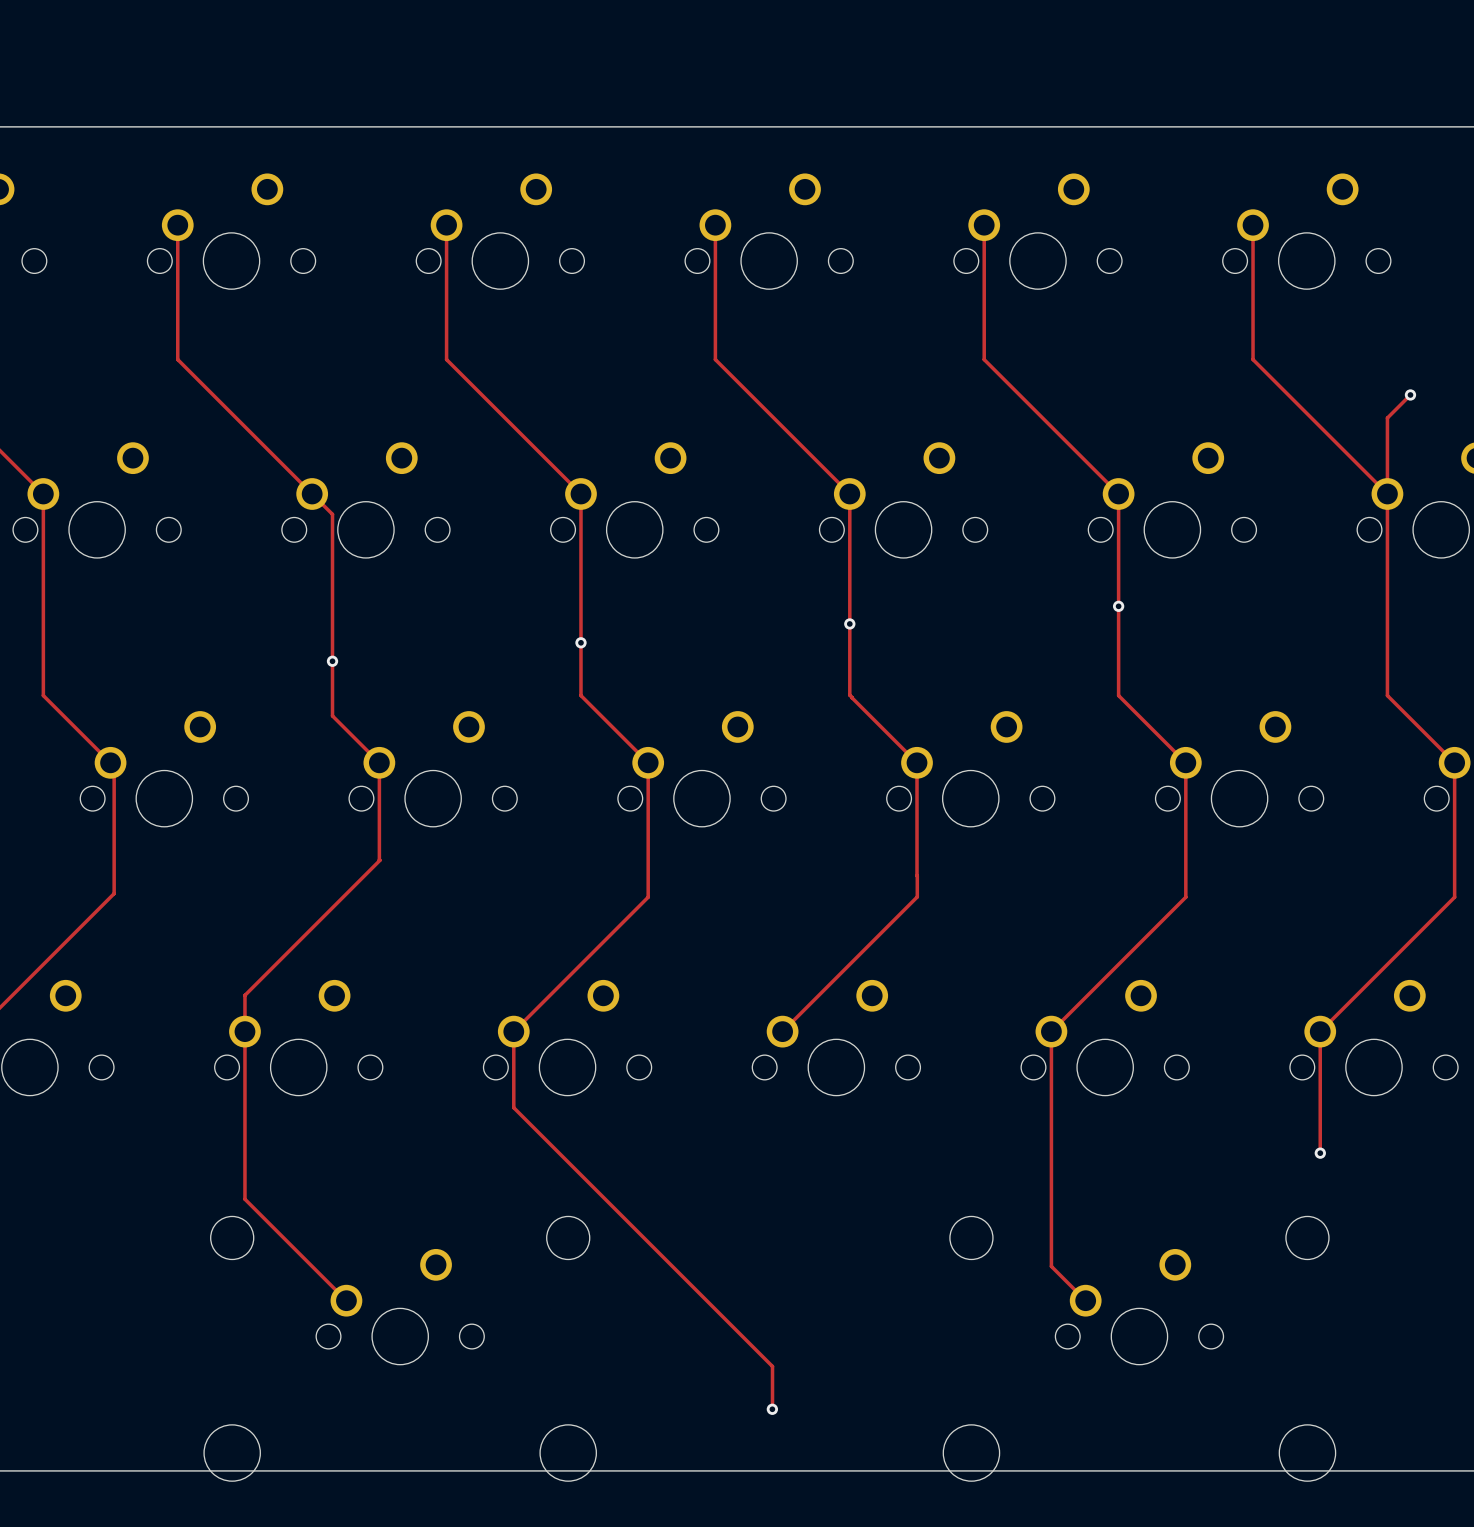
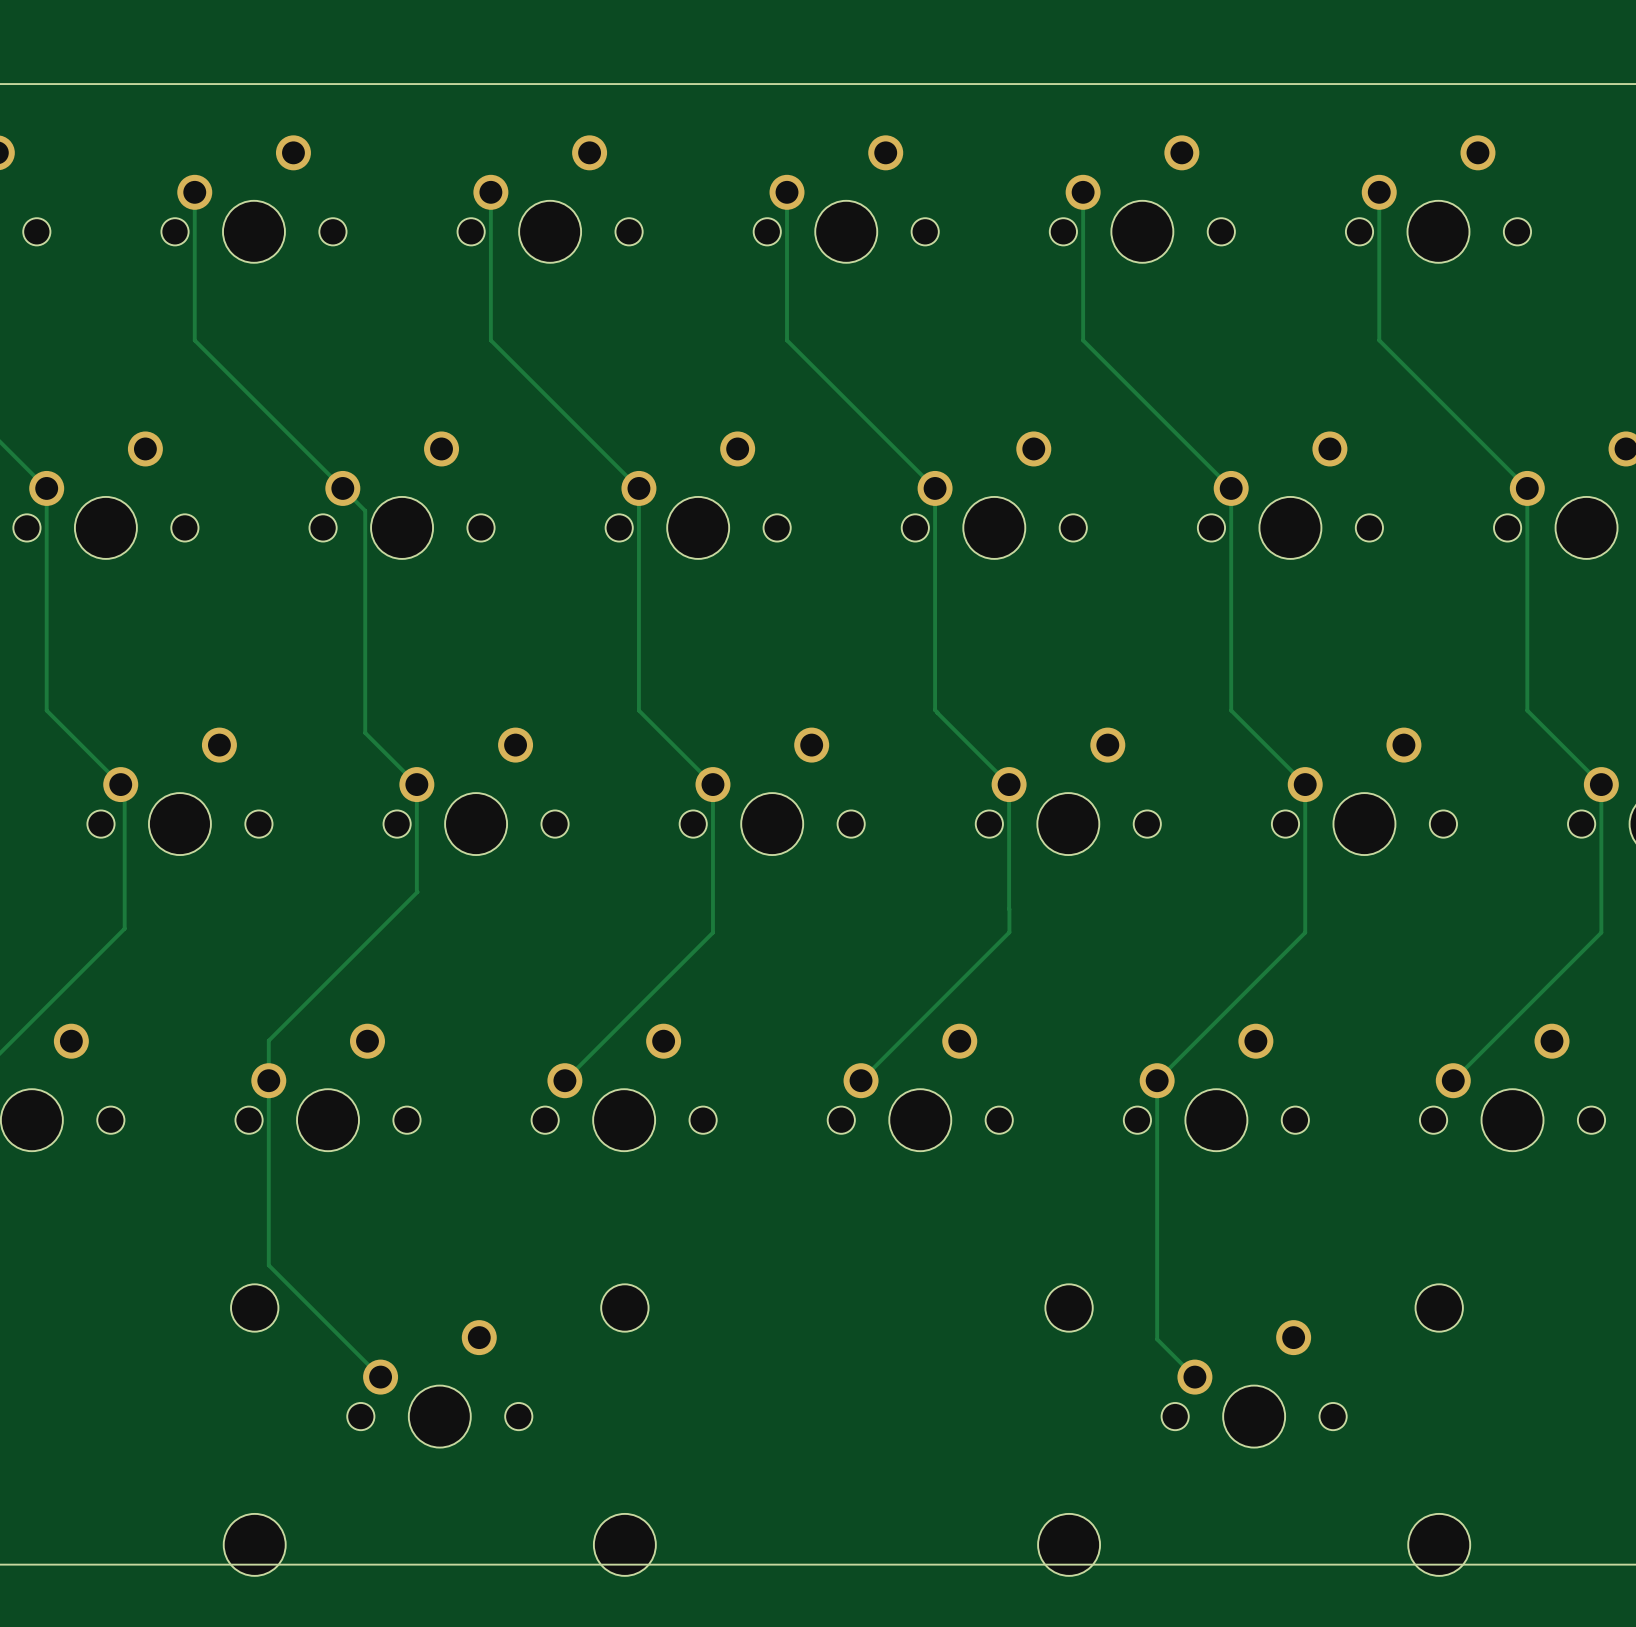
track: (1410, 394) (1387, 418) (1387, 493) -> none
via: (1410, 394) -> none
via: (1118, 606) -> none
via: (849, 623) -> none
via: (580, 642) -> none
via: (332, 661) -> none
track: (513, 1031) (513, 1107) (772, 1366) (772, 1409) -> none
track: (1320, 1031) (1320, 1153) -> none
via: (1320, 1153) -> none
via: (772, 1409) -> none

